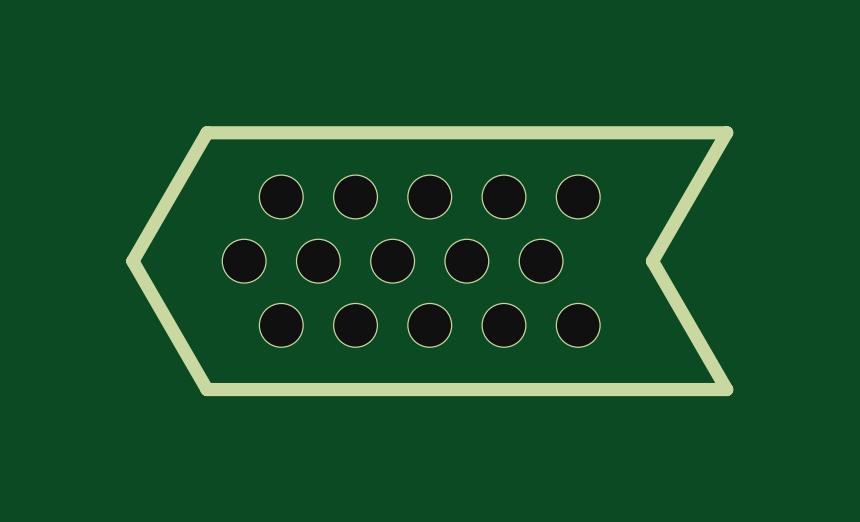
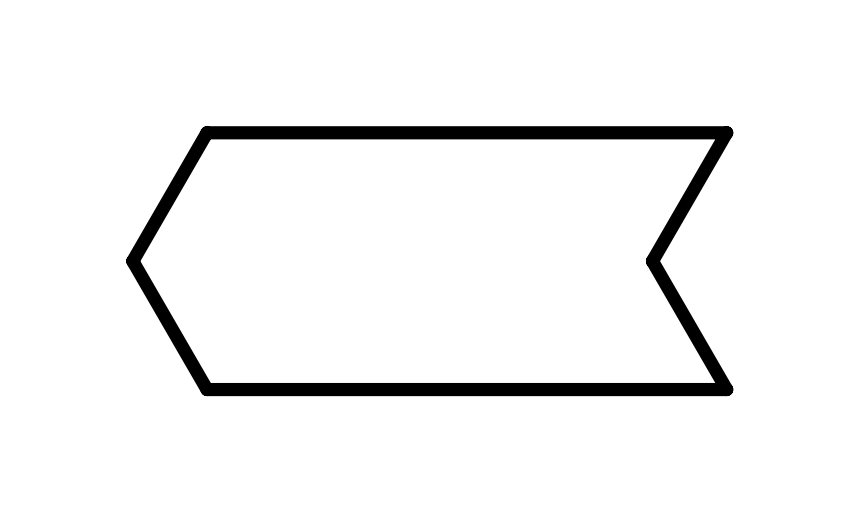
hole: (281, 196) -> none
hole: (355, 196) -> none
hole: (429, 196) -> none
hole: (503, 196) -> none
hole: (578, 196) -> none
hole: (244, 261) -> none
hole: (318, 261) -> none
hole: (392, 261) -> none
hole: (466, 261) -> none
hole: (541, 261) -> none
hole: (281, 325) -> none
hole: (355, 325) -> none
hole: (429, 325) -> none
hole: (503, 325) -> none
hole: (578, 325) -> none

